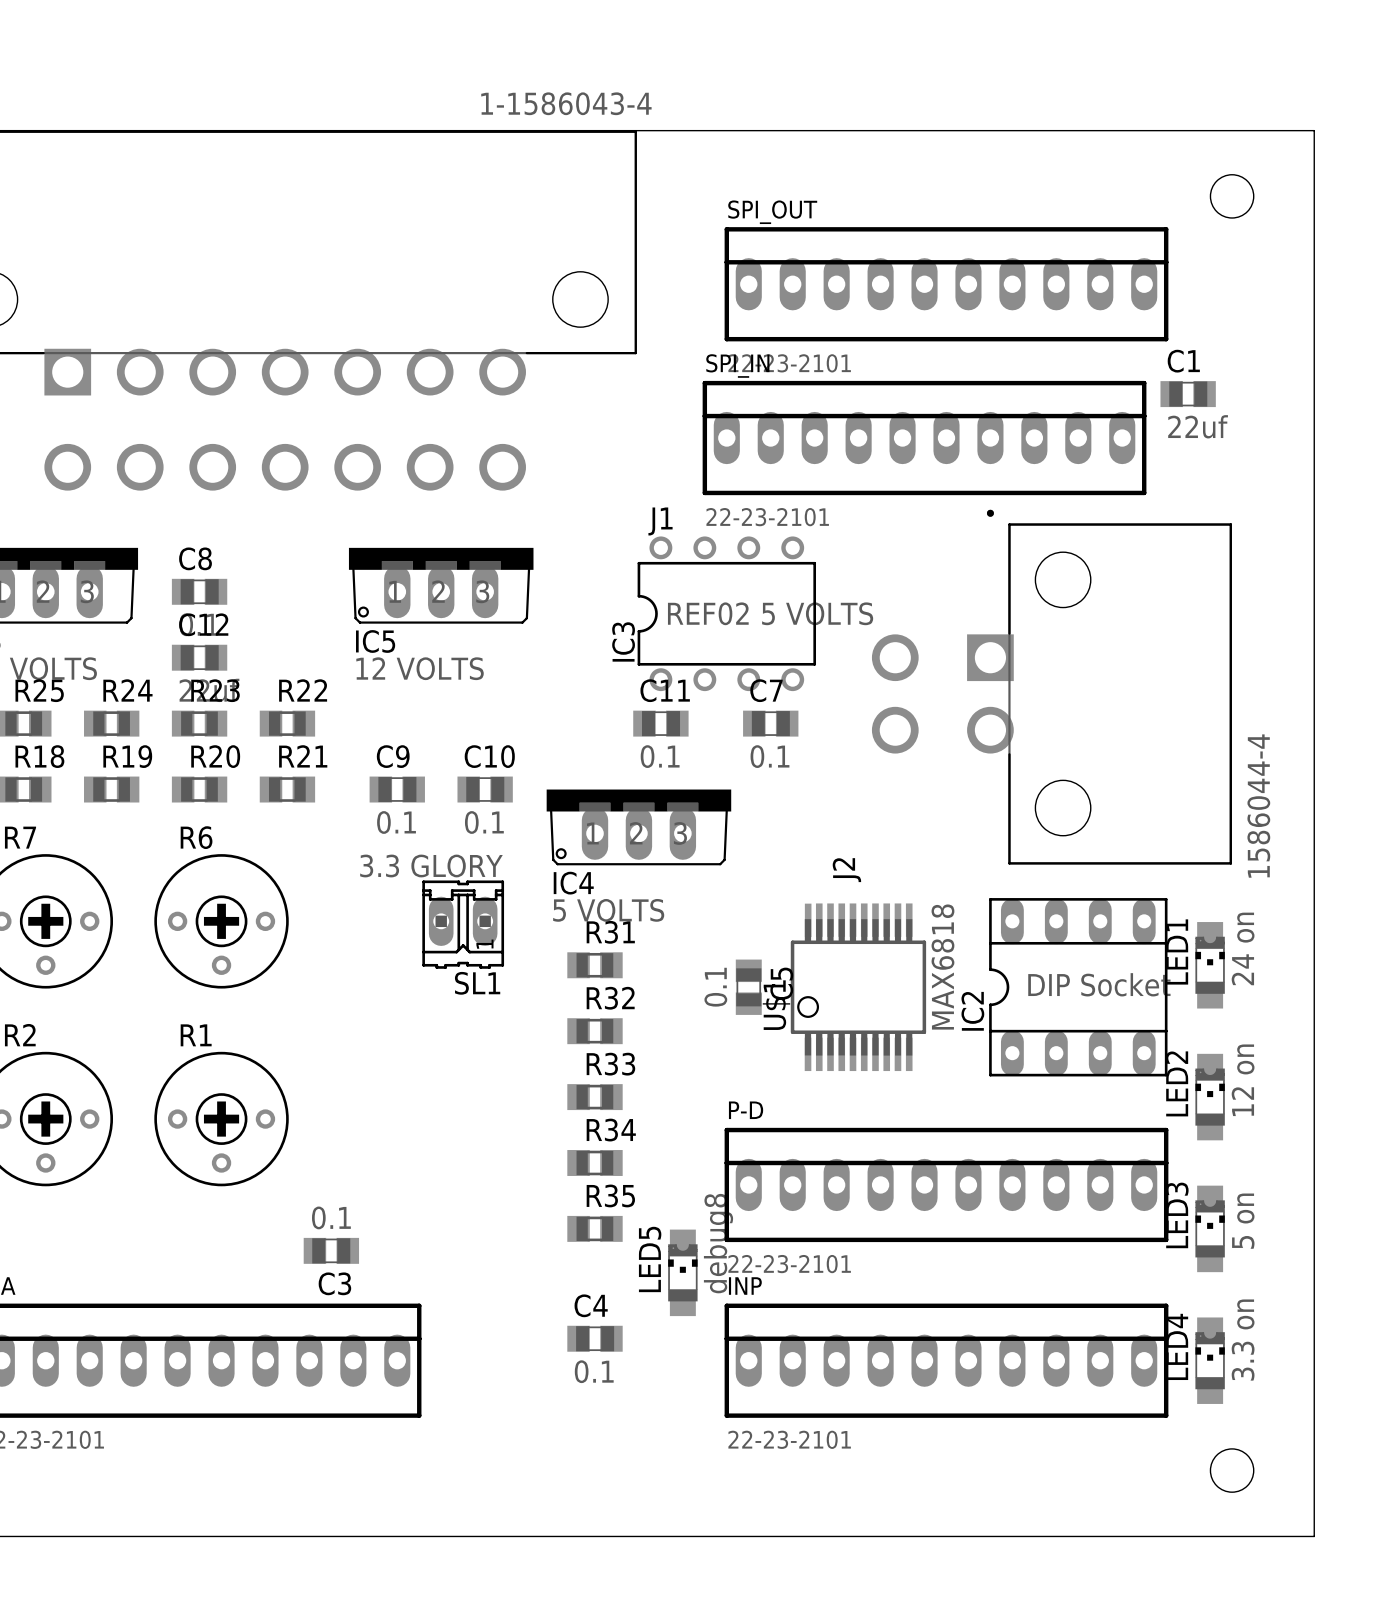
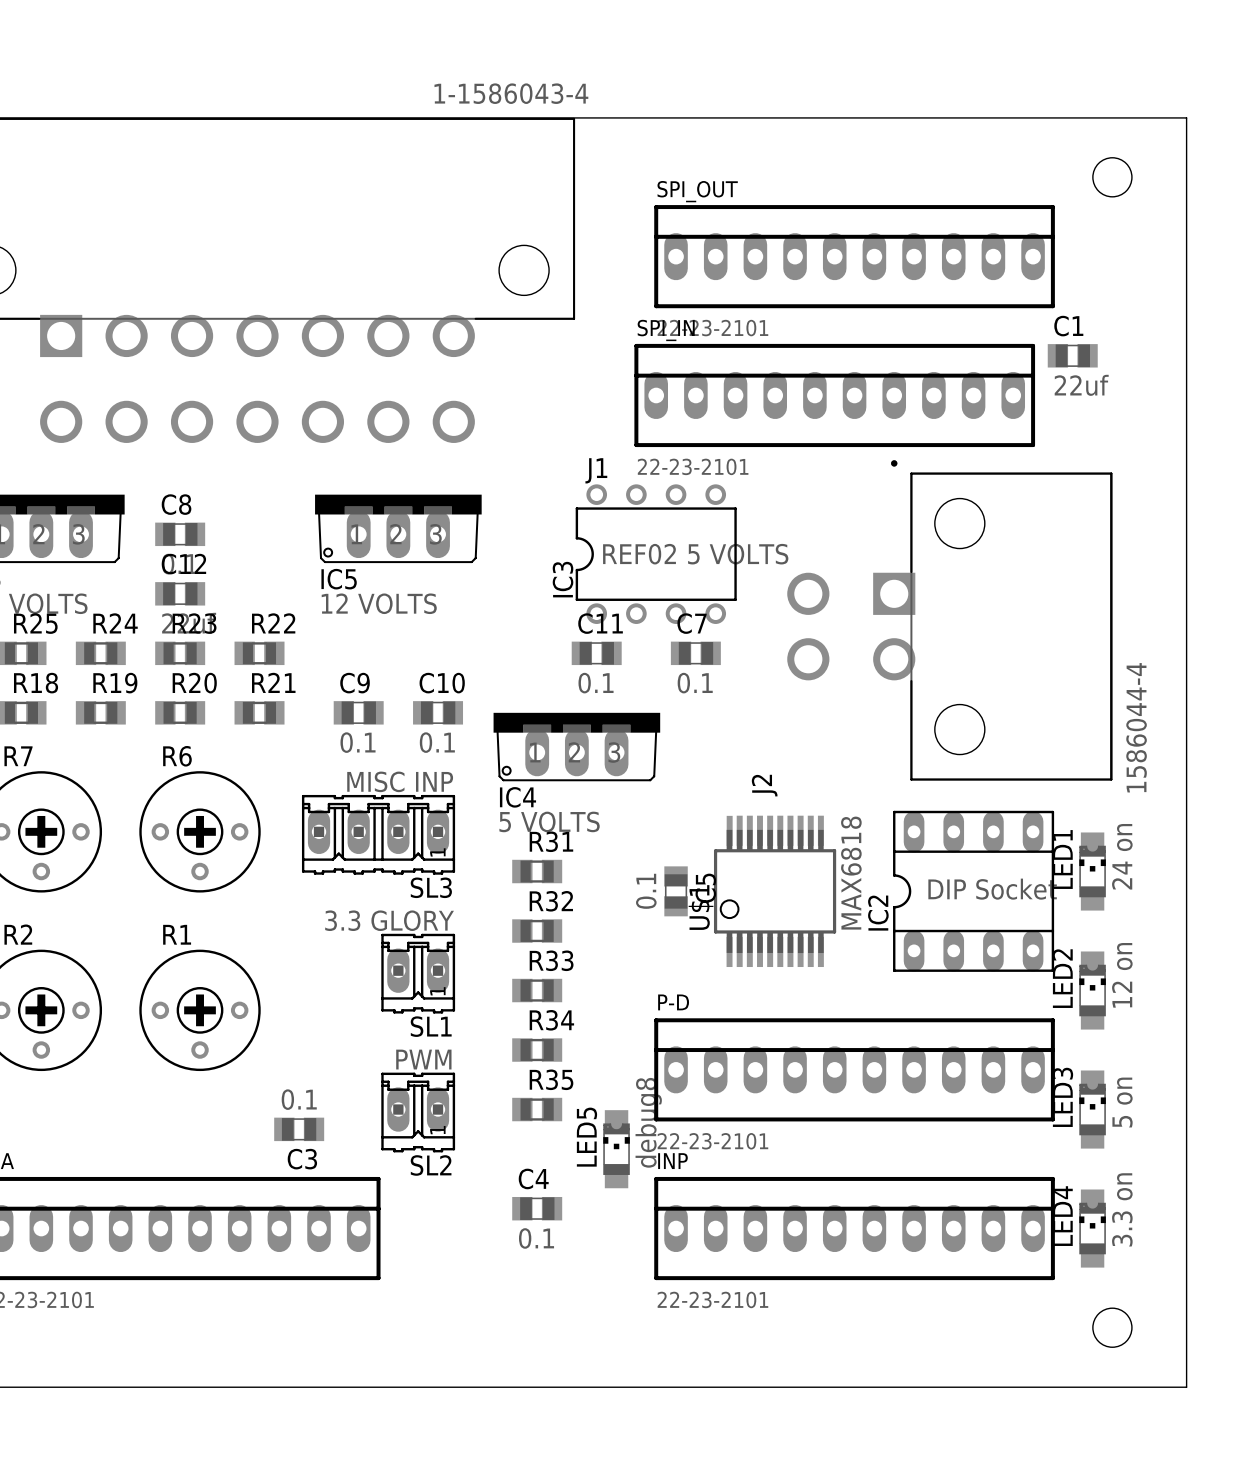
SL3: none -> MISC INP (378, 834)
SL1 position: (463, 924) -> (418, 973)
SL2: none -> PWM (418, 1112)

